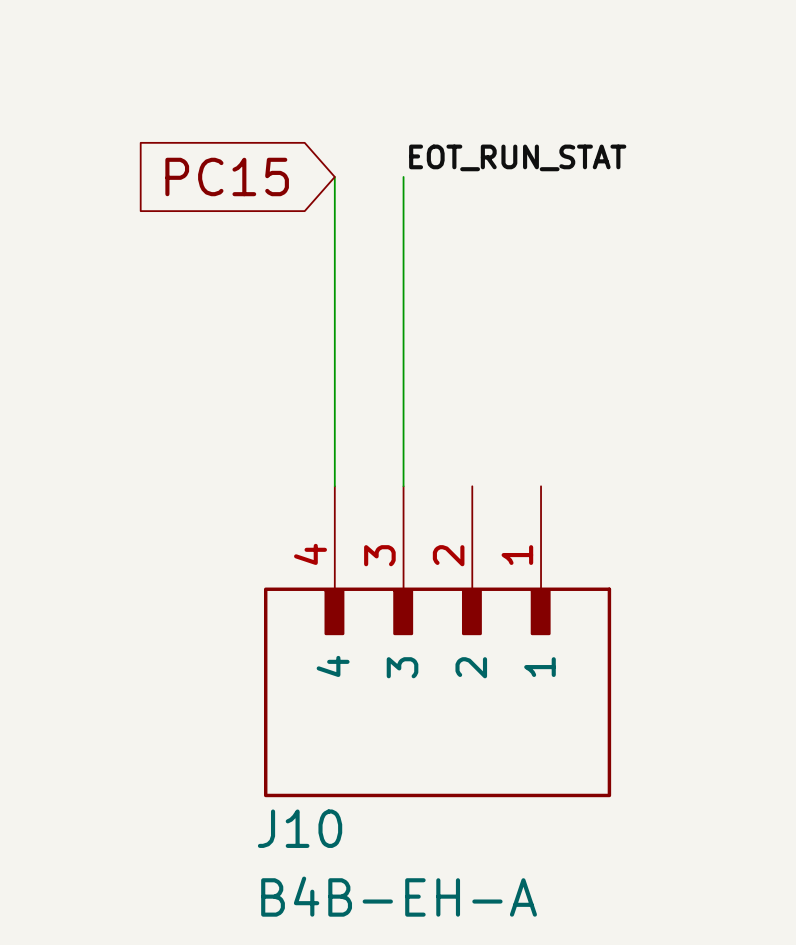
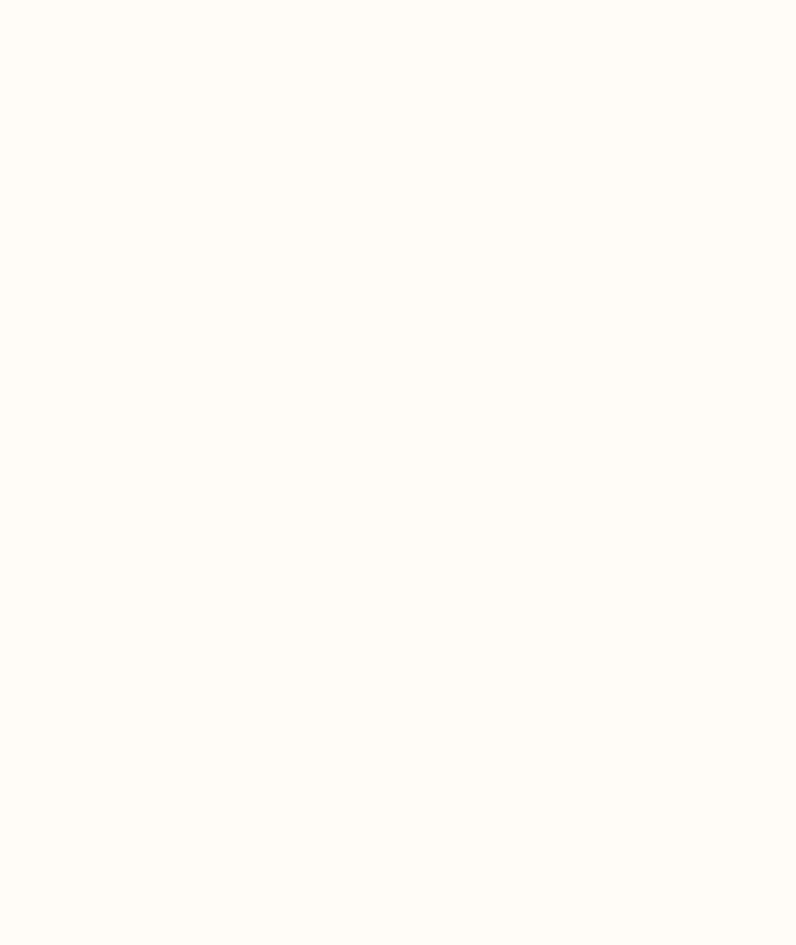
label: EOT_RUN_STAT (517, 157) -> none
global label: PC15 (227, 176) -> none
wire: (334, 176) (334, 486) -> none
wire: (403, 176) (403, 486) -> none
J10: B4B-EH-A (437, 641) -> none

